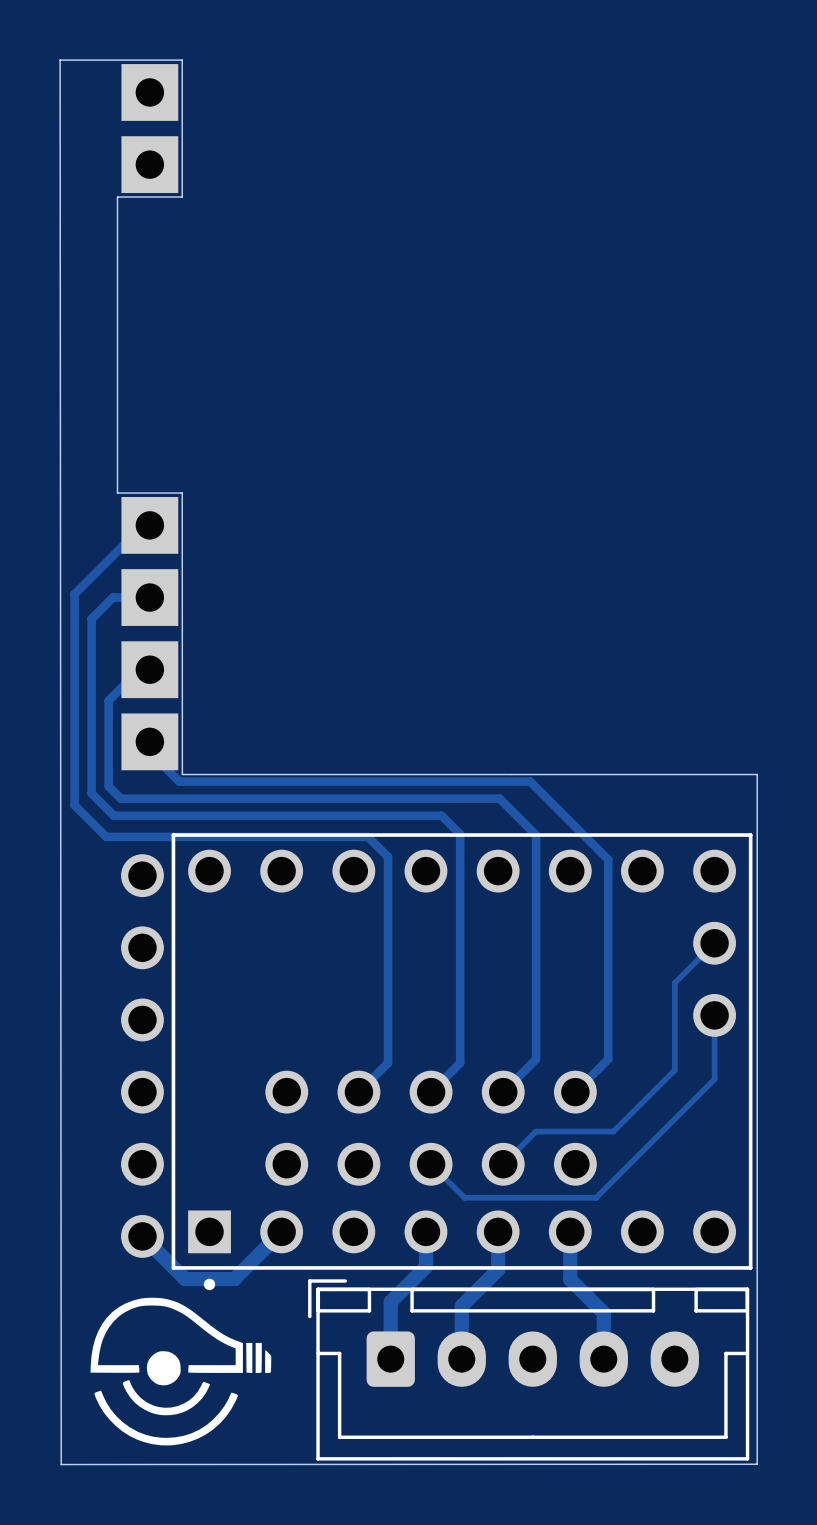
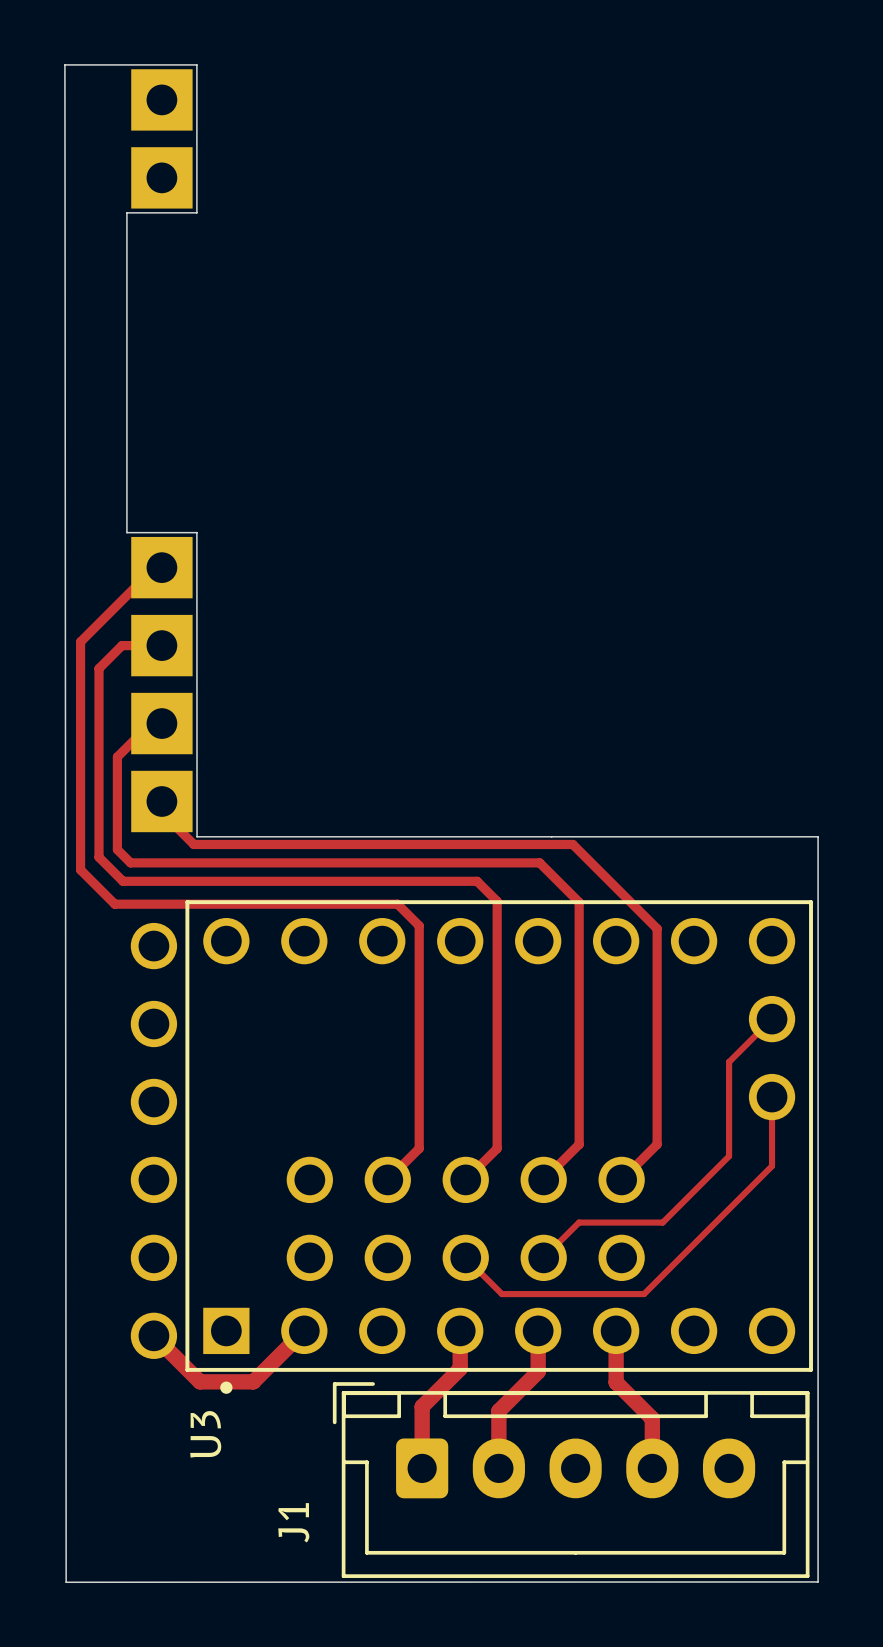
drawing: [90, 1297, 272, 1446] -> none
U3 name: none -> U3 (205, 1434)
J1 name: none -> J1 (293, 1522)

